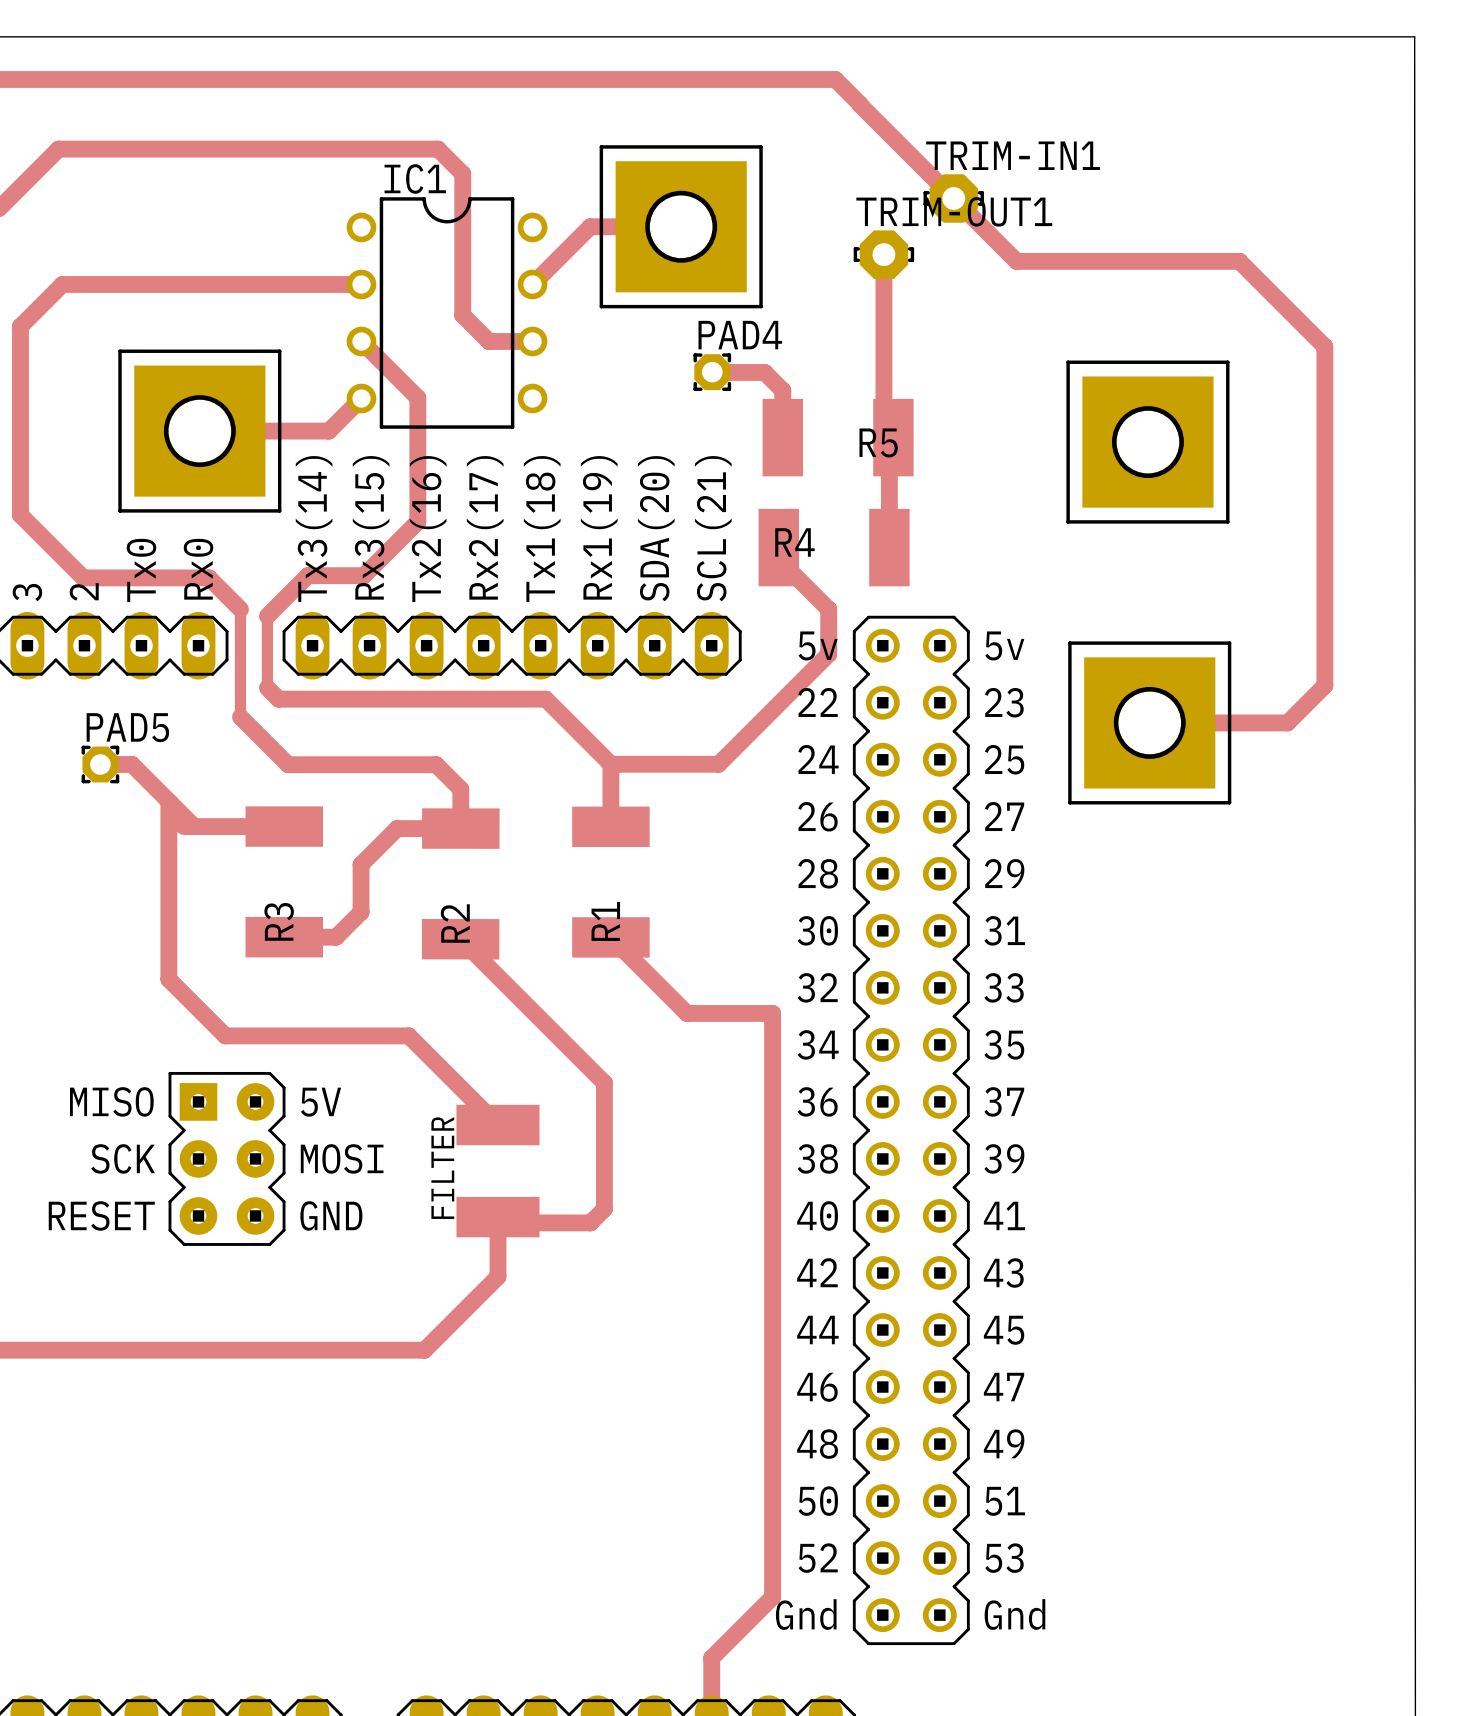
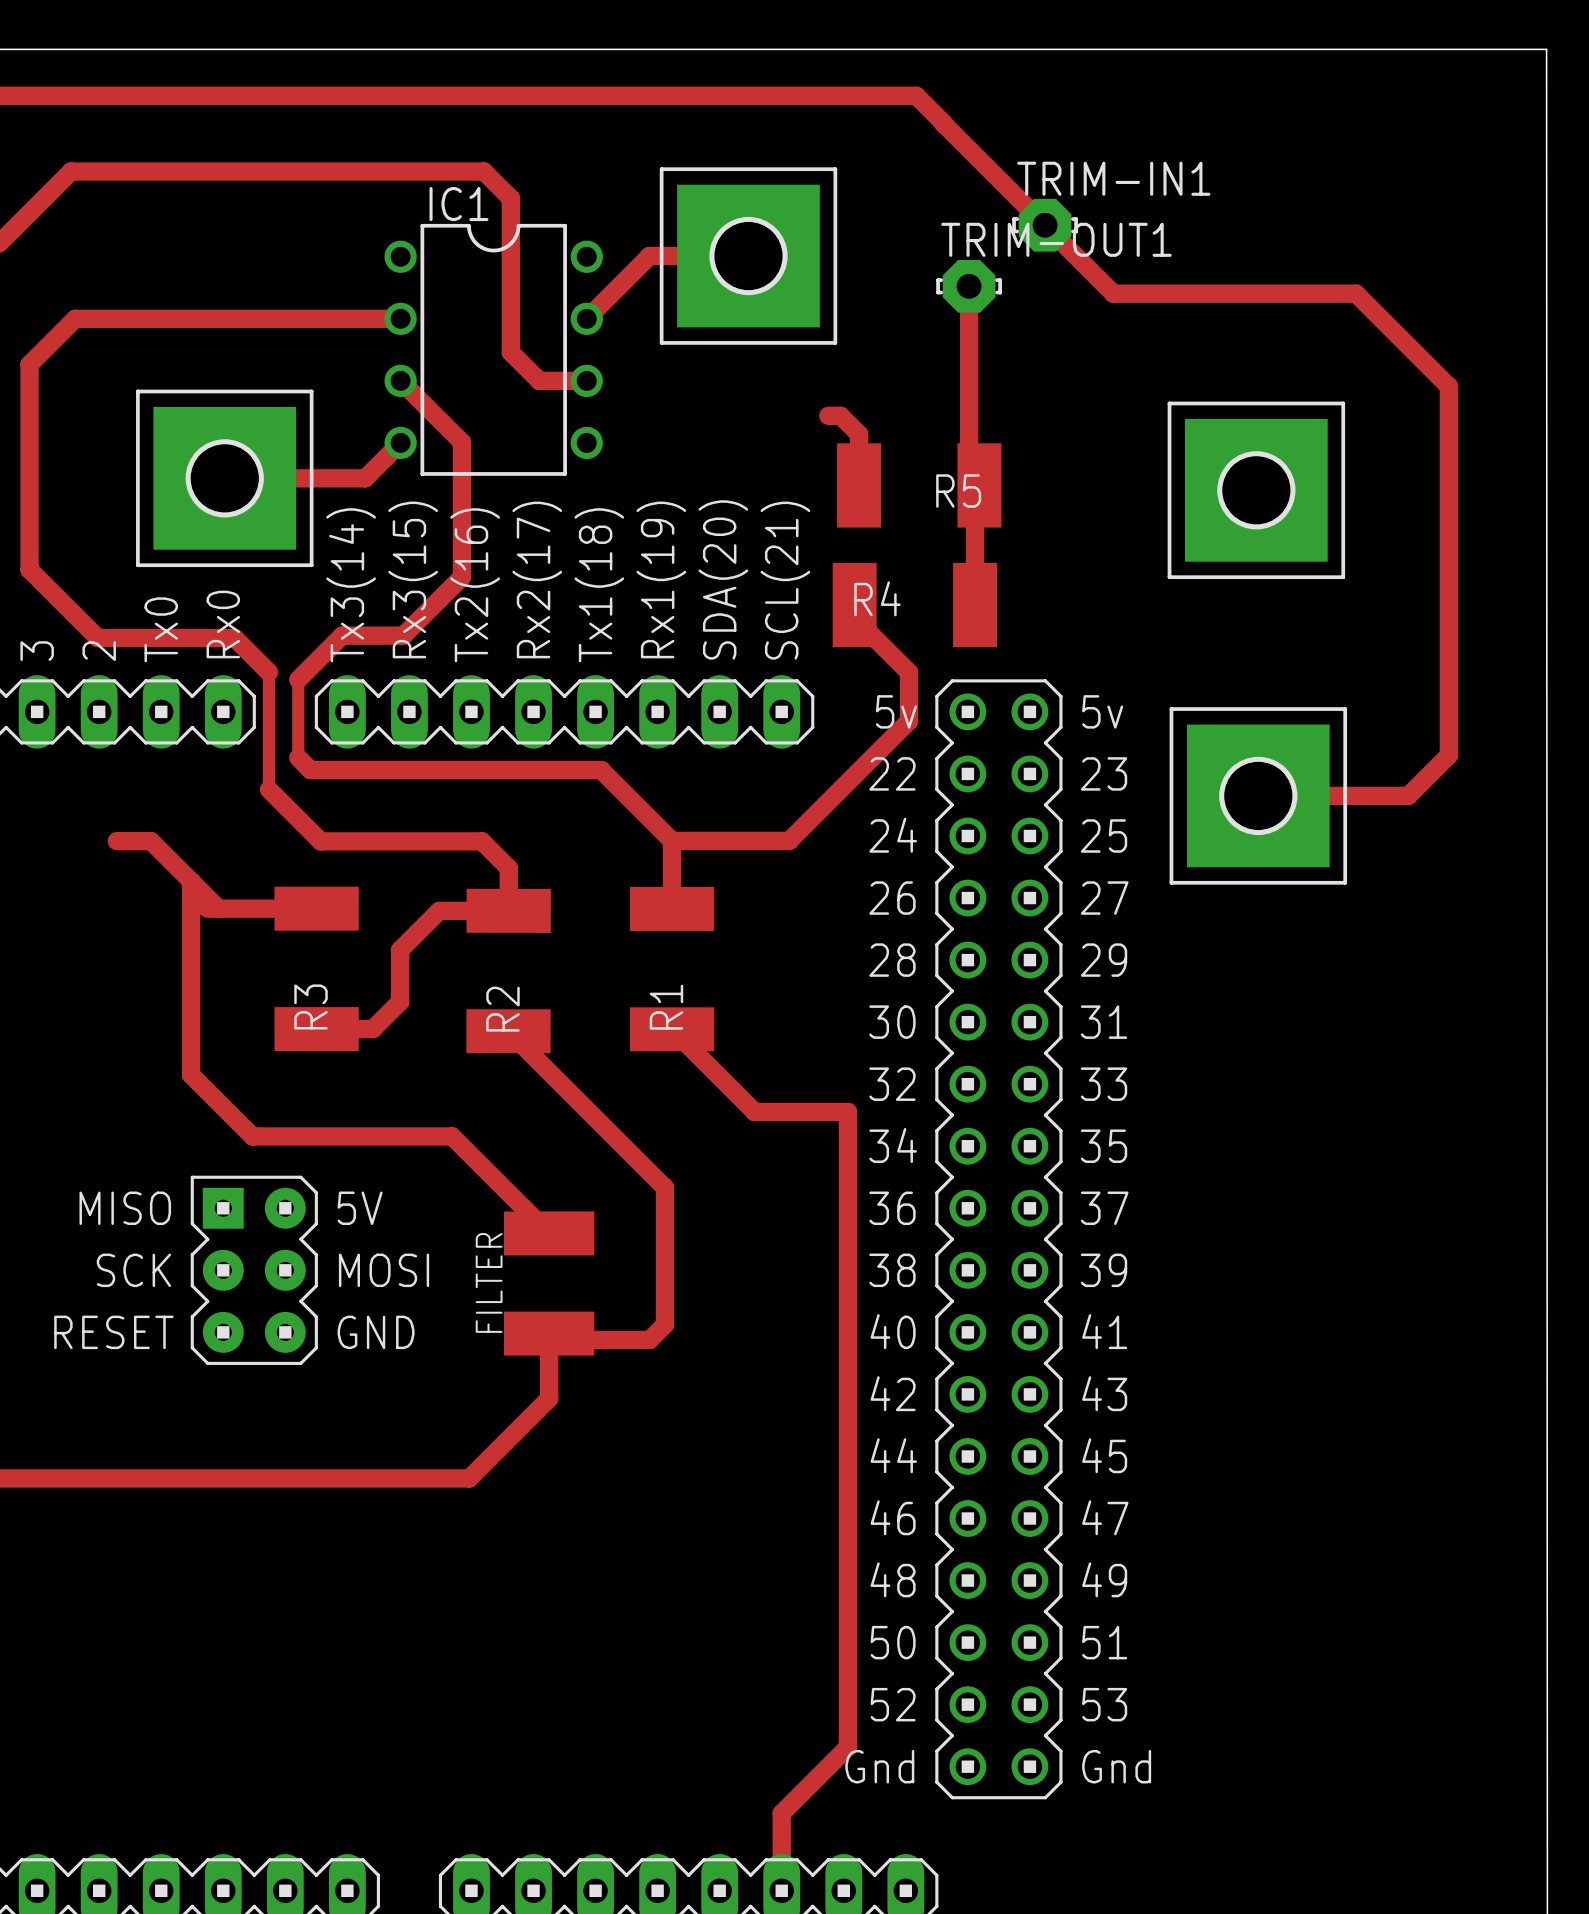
top track: (711, 372) (765, 373) -> (828, 415) (840, 415)
PAD4: (712, 372) -> none
PAD5: (100, 764) -> none

